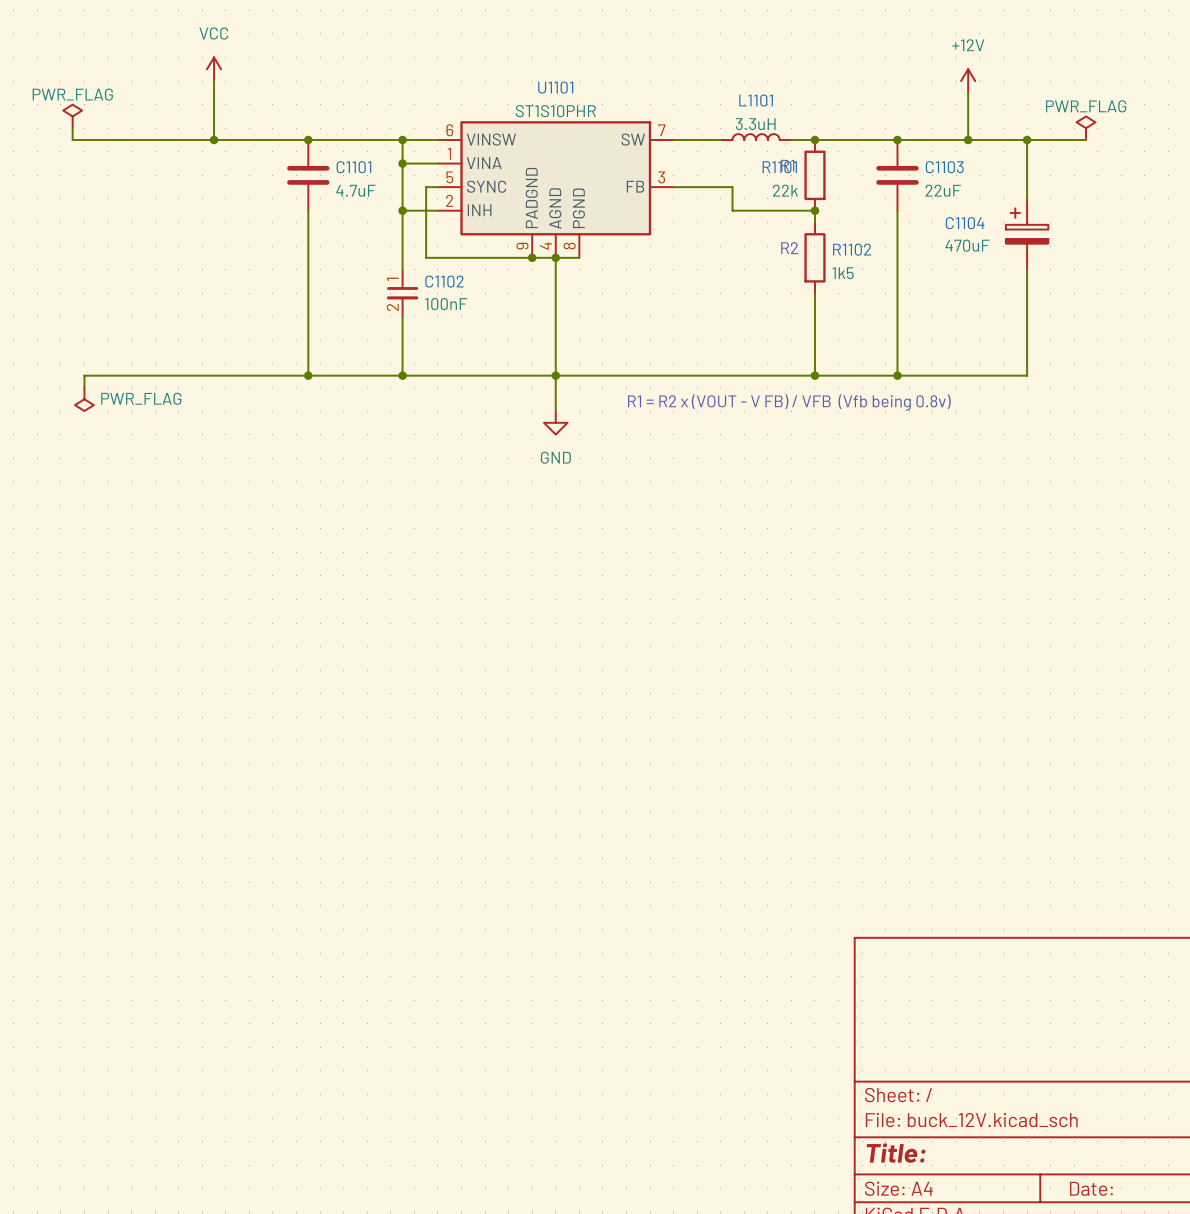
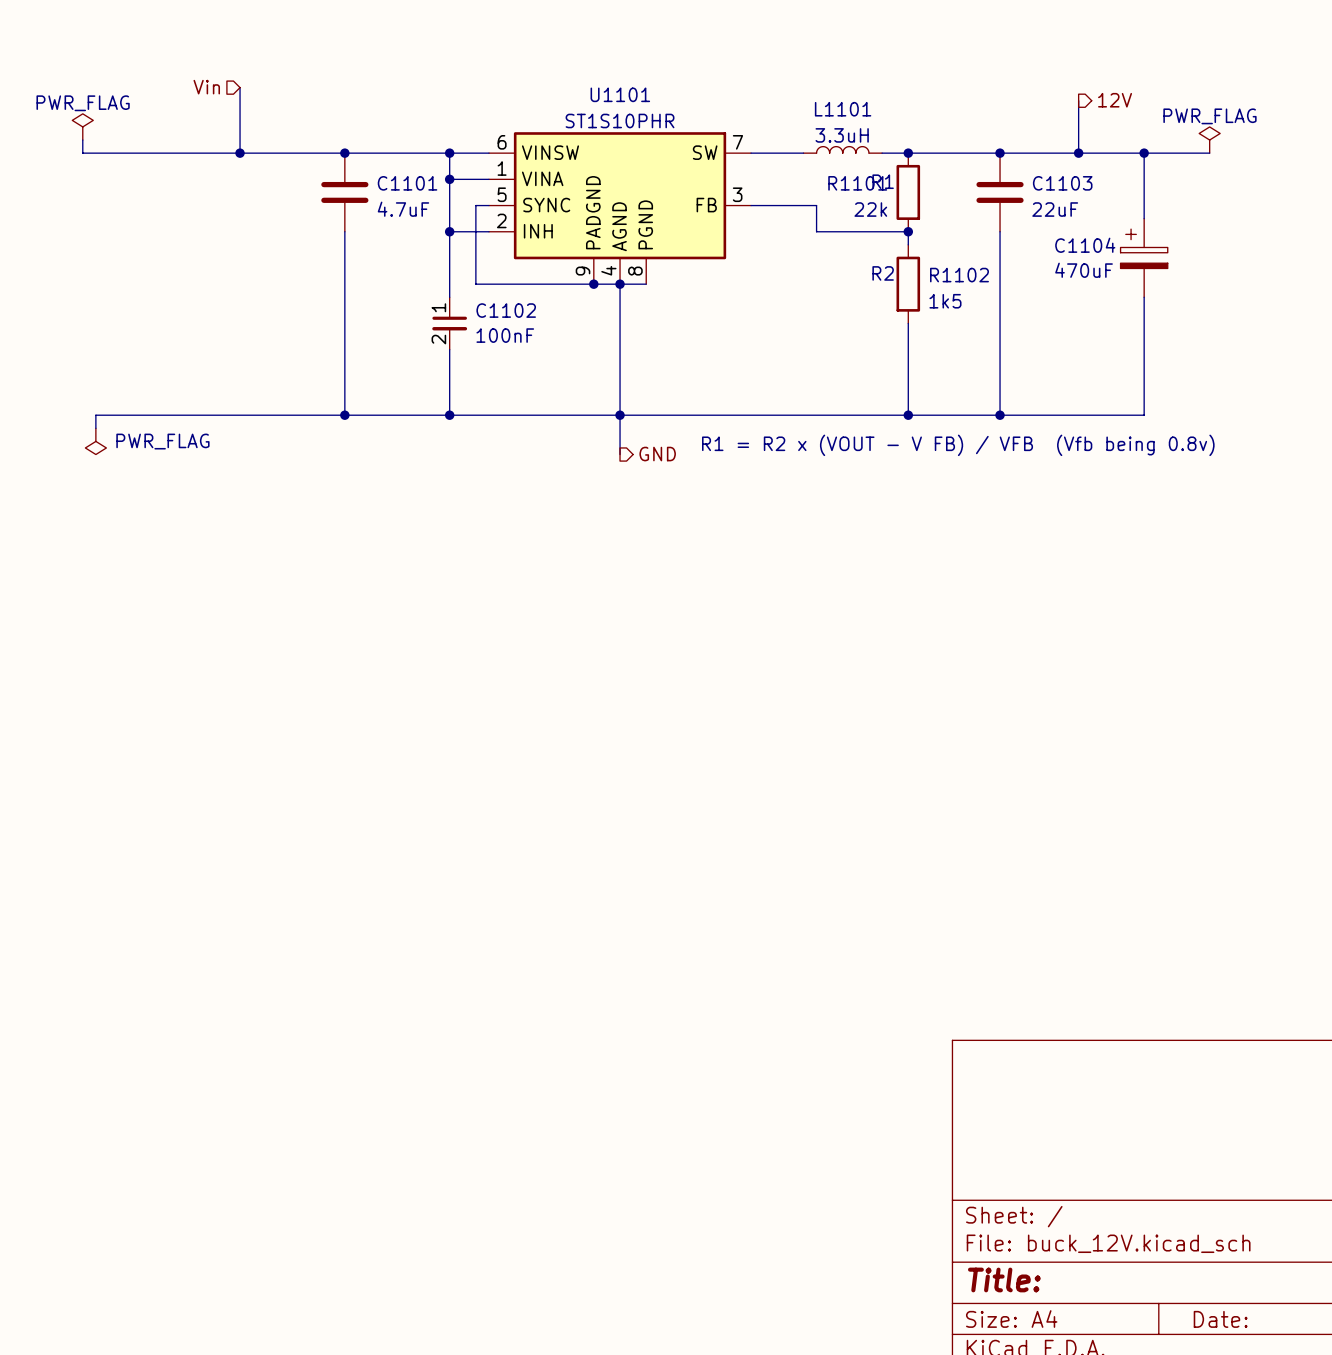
power symbol: VCC (214, 69) -> none
hierarchical label: none -> Vin (206, 87)
power symbol: +12V (968, 81) -> none
hierarchical label: none -> 12V (1115, 100)
hierarchical label: none -> GND (657, 454)
power symbol: GND (555, 422) -> none

